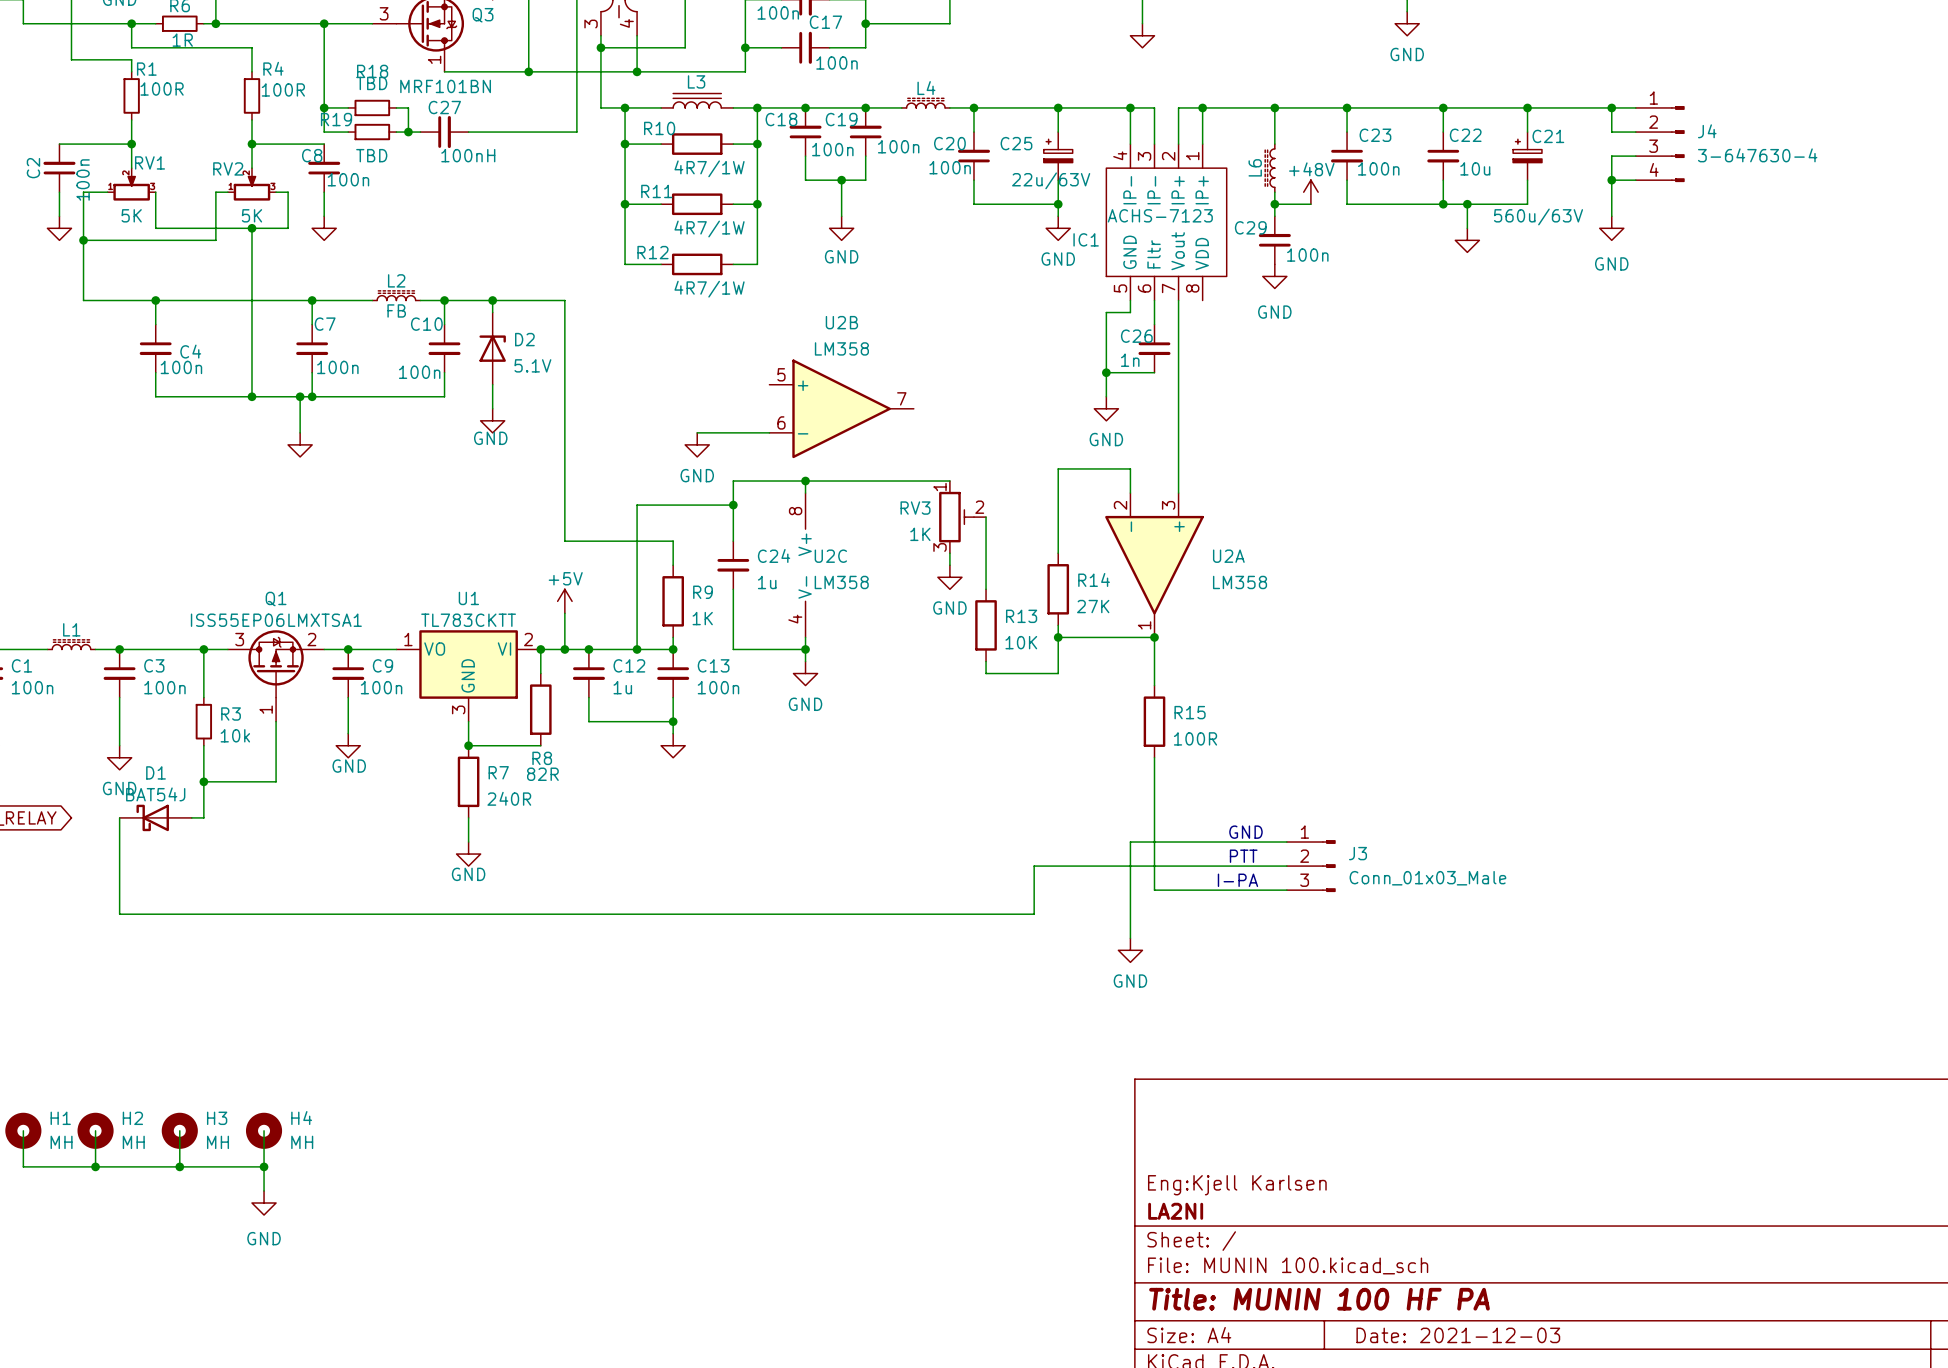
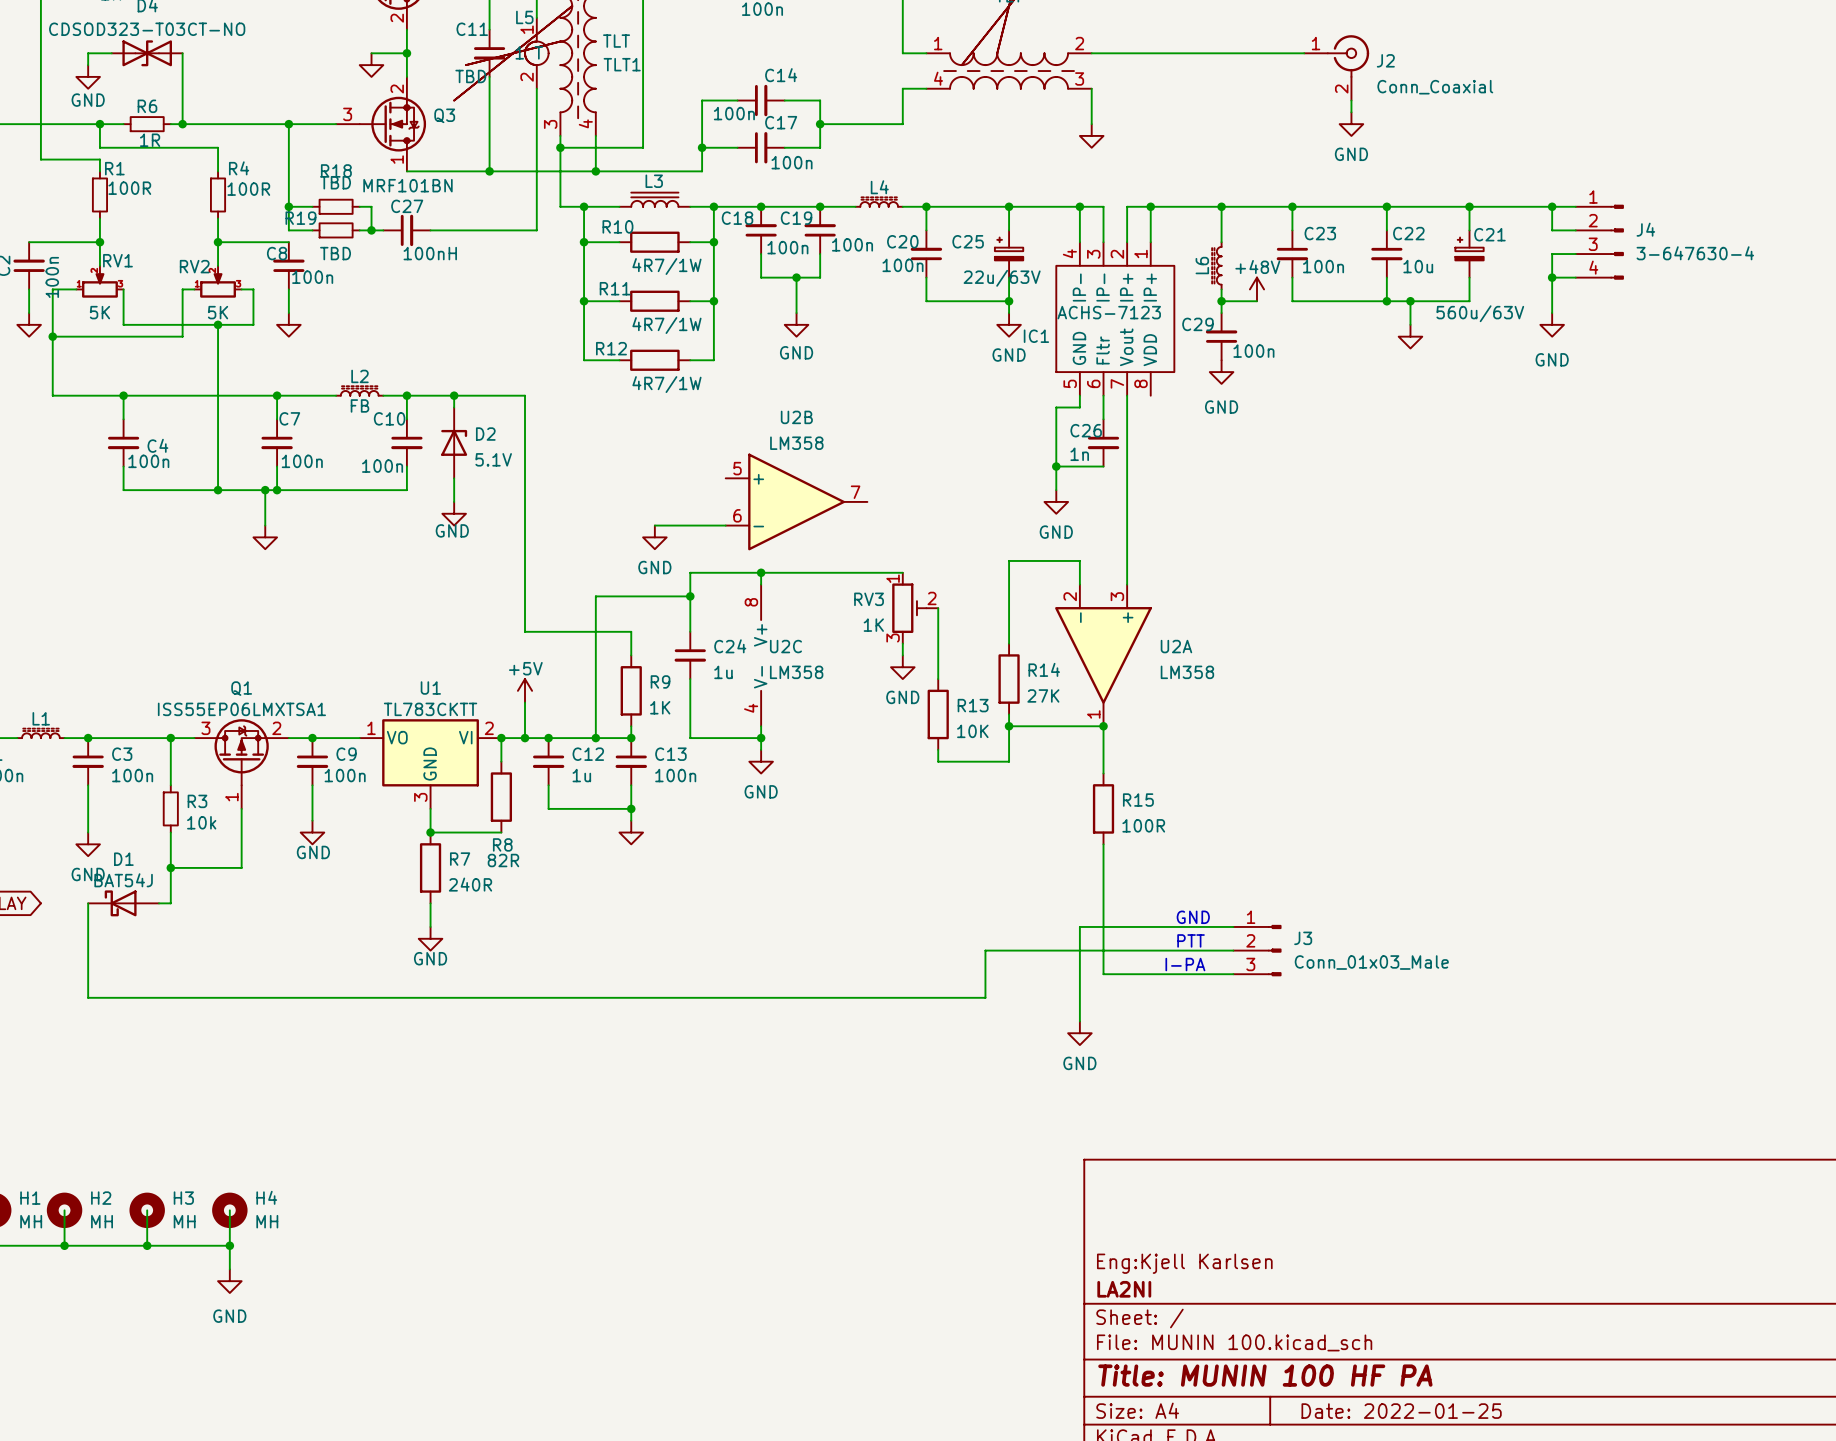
title block: Date: 2021-12-03 (1458, 1335) -> Date: 2022-01-25 (1401, 1411)

